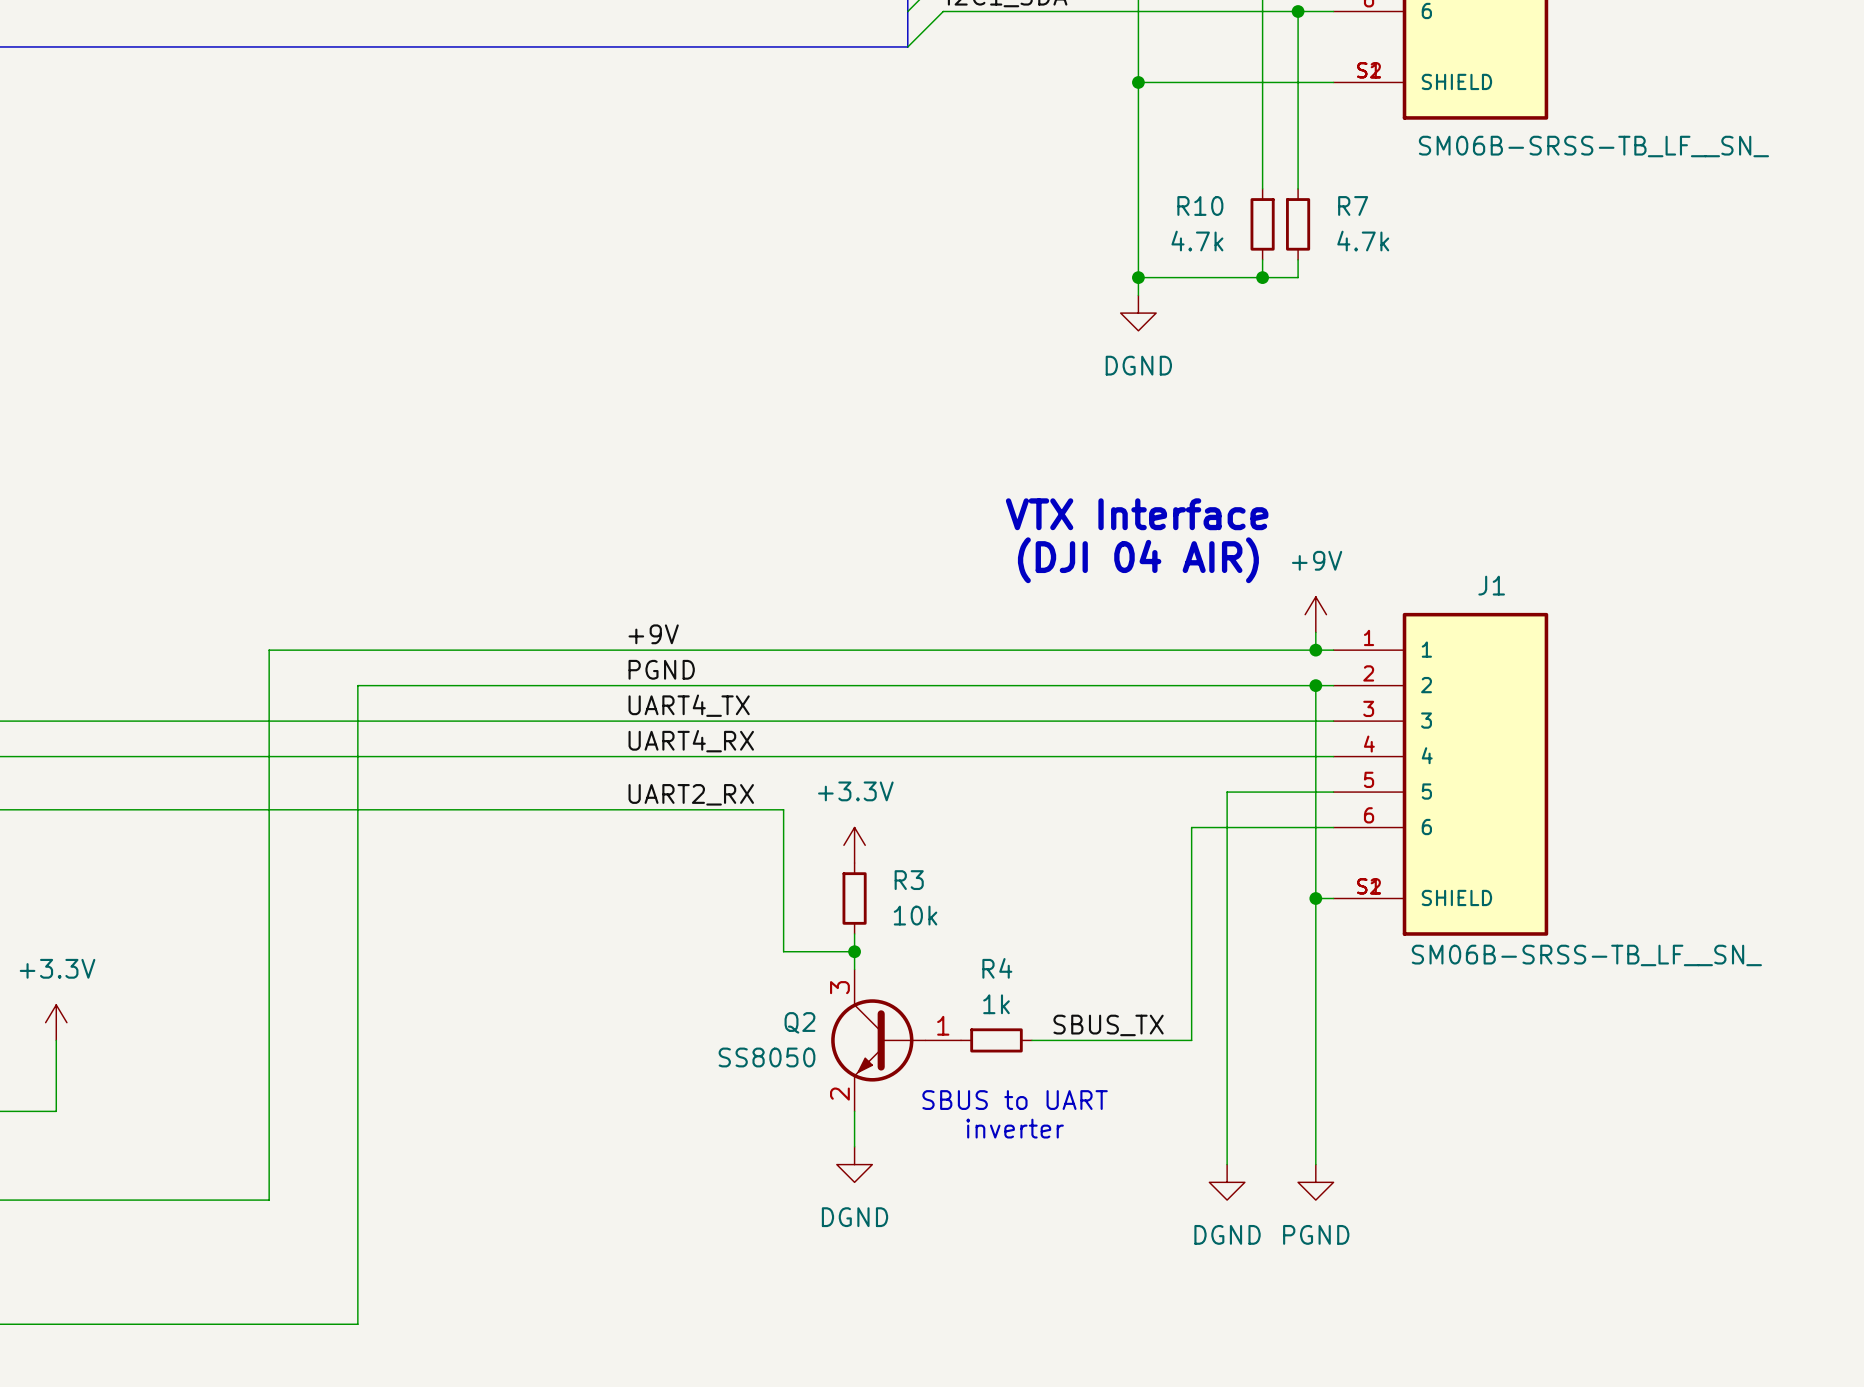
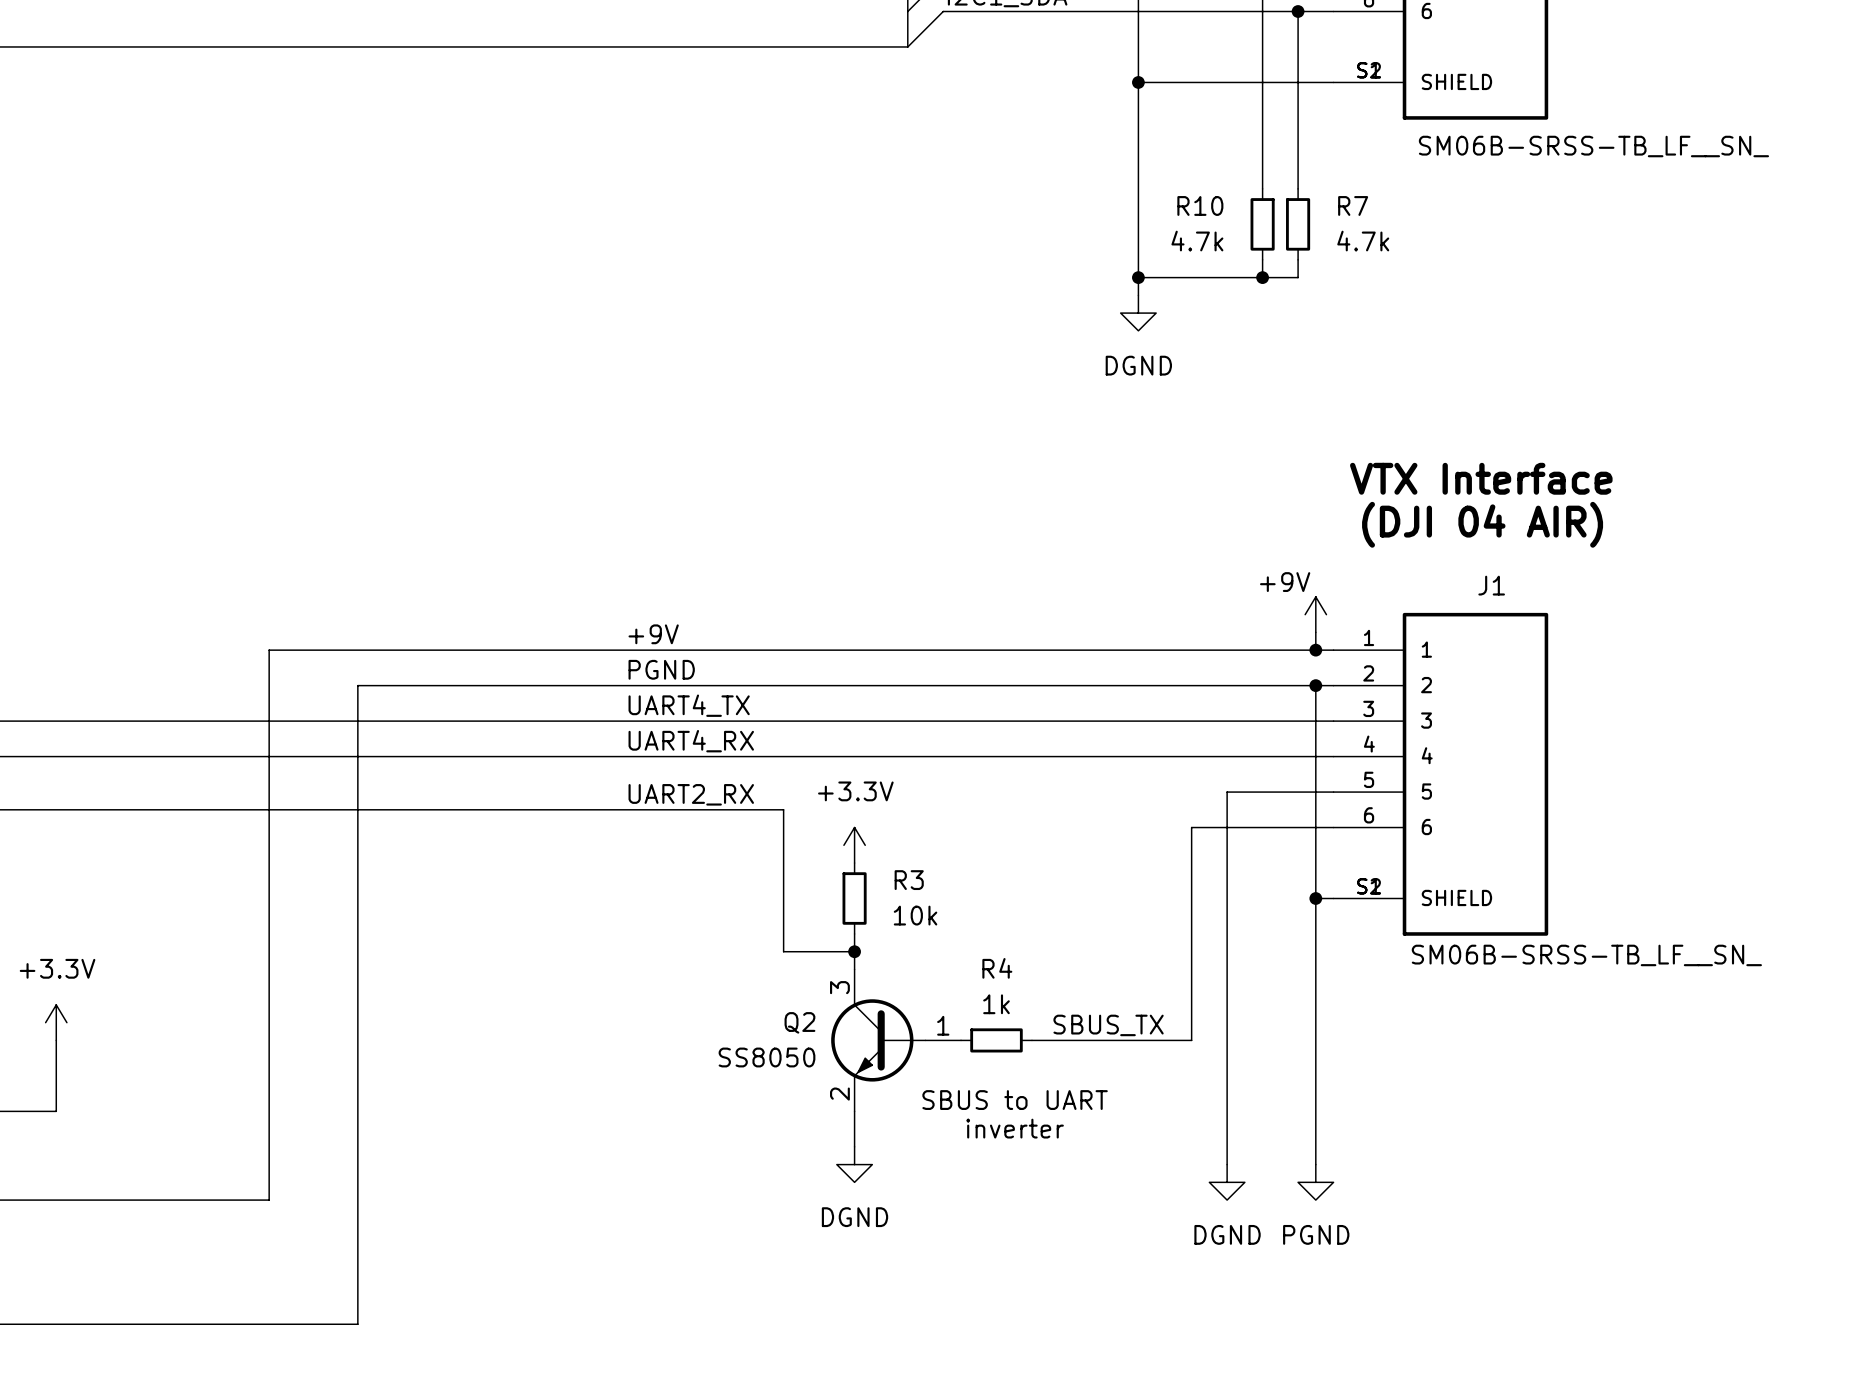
text position: VTX Interface (1137, 514) -> VTX Interface (1481, 478)
text position: (DJI 04 AIR) (1138, 560) -> (DJI 04 AIR) (1482, 524)
power symbol text position: +9V (1317, 560) -> +9V (1285, 582)

